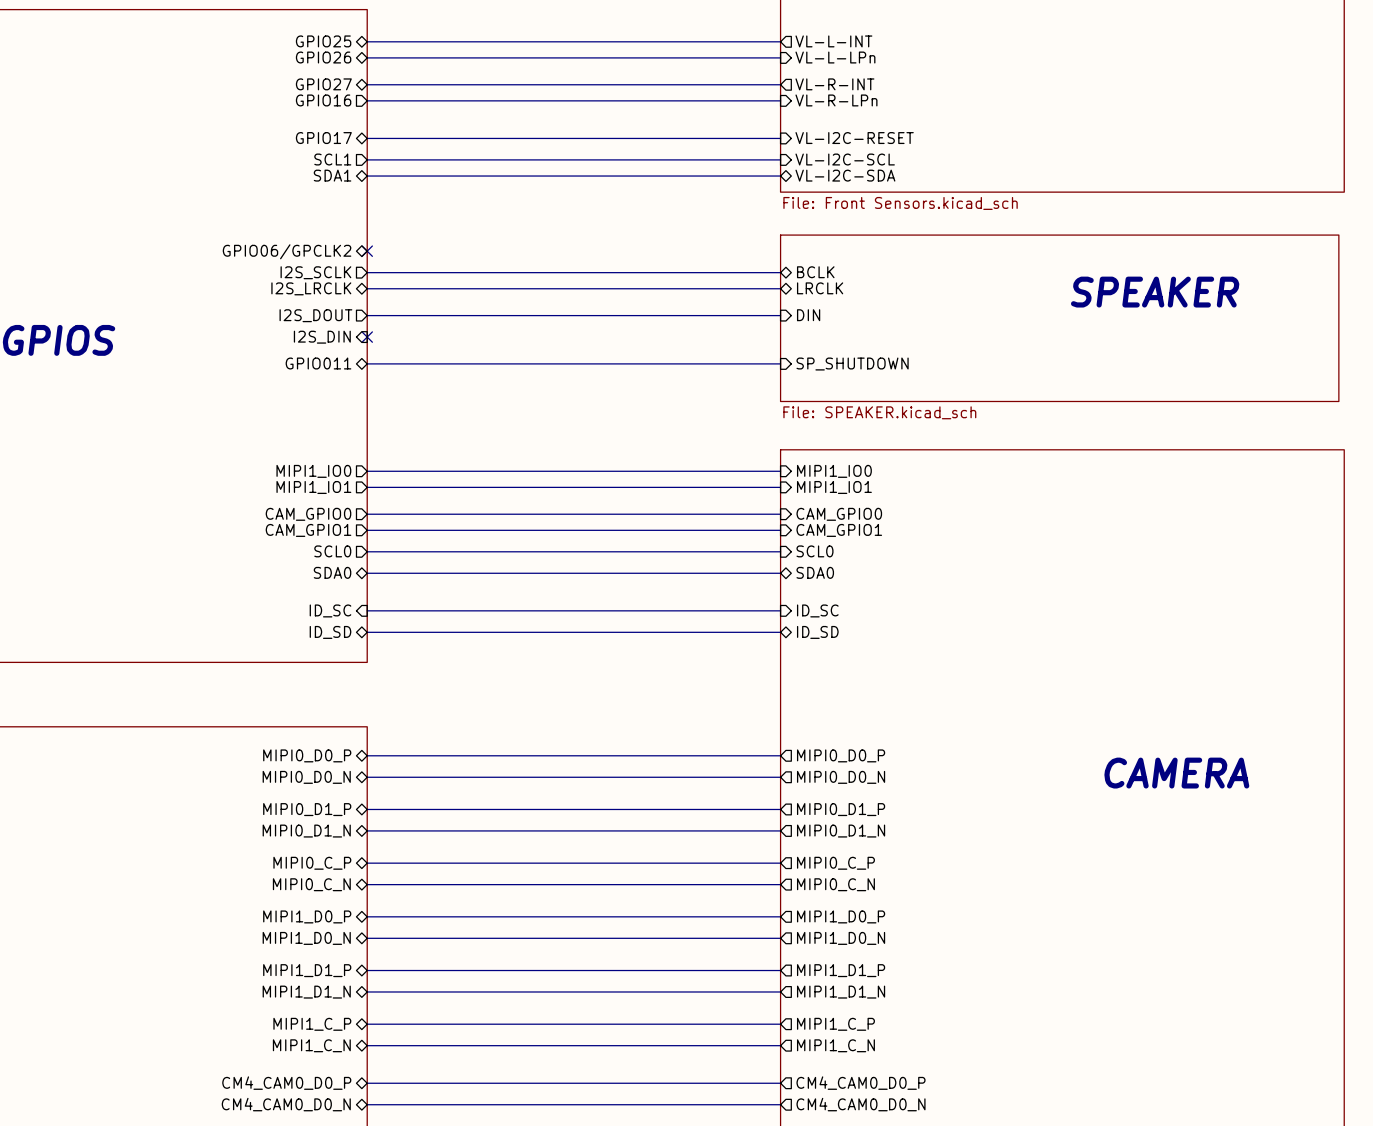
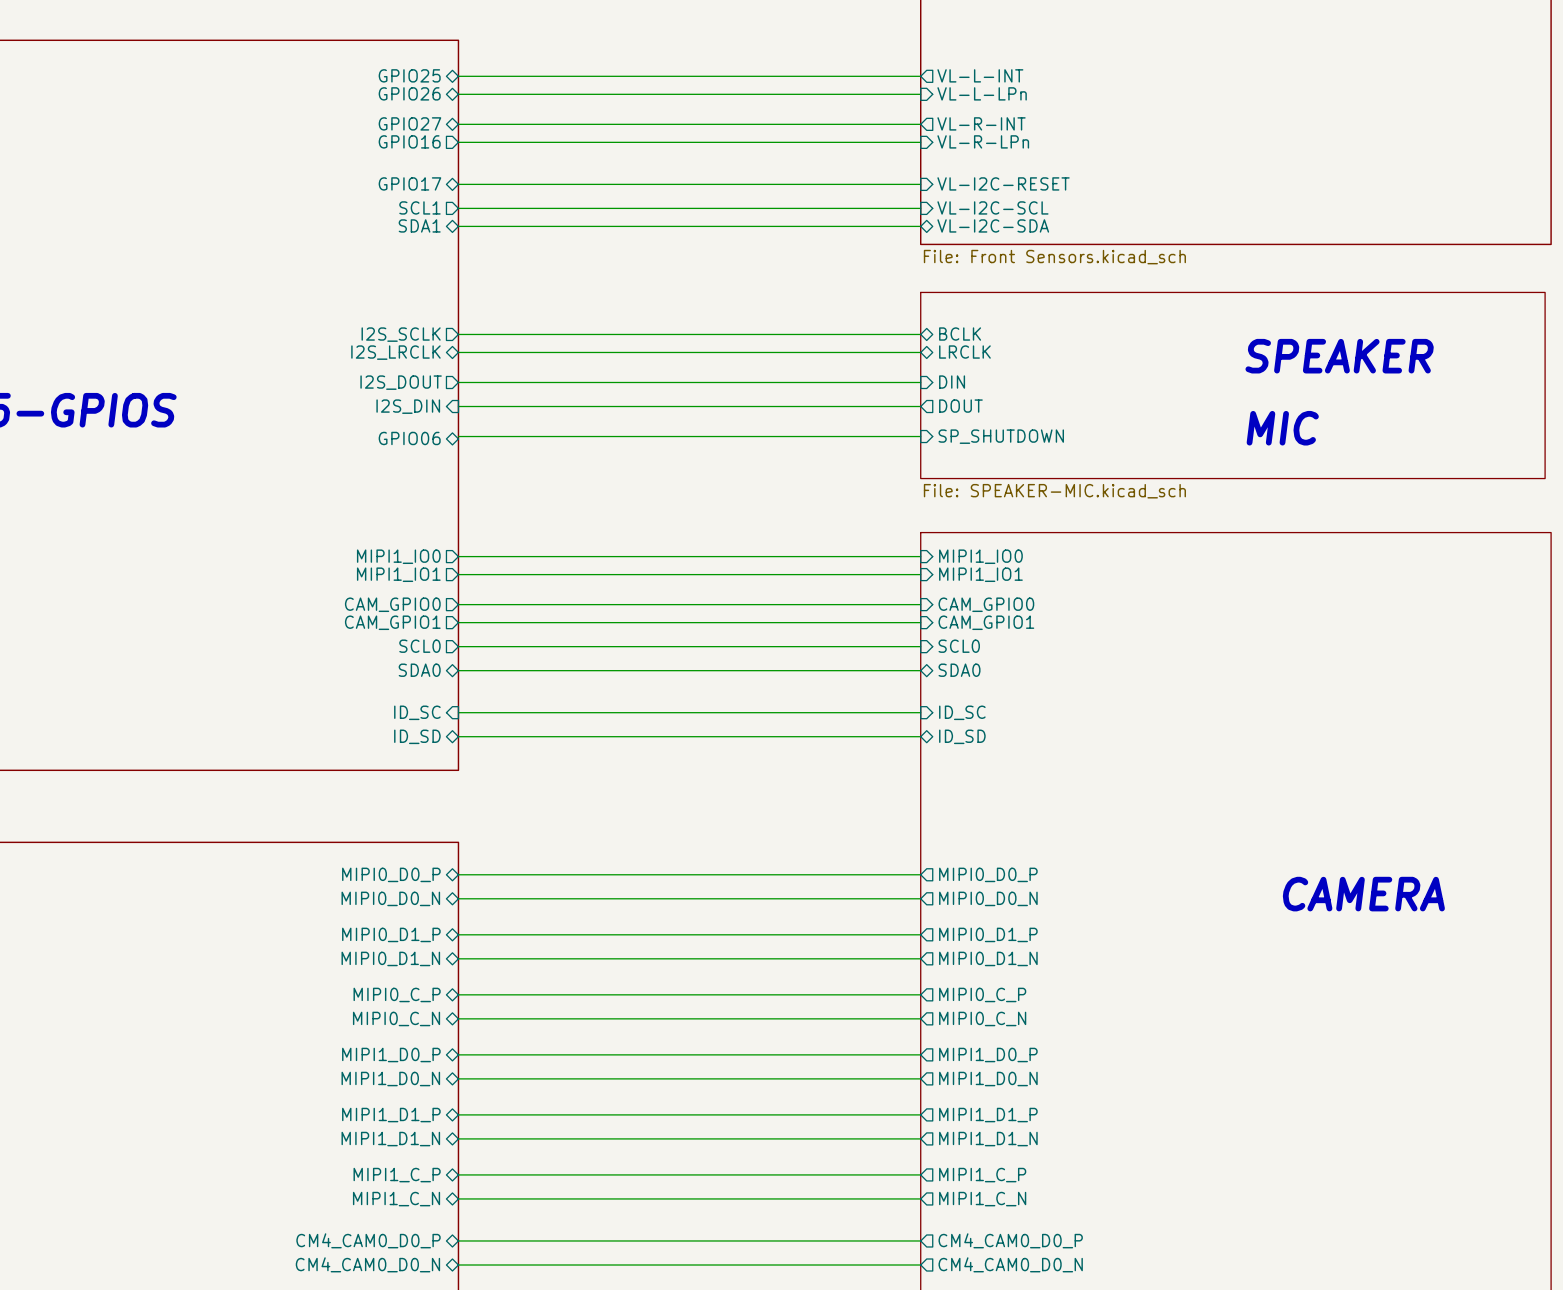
sheet pin: GPIO06/GPCLK2 (287, 251) -> none
no-connect mark: (367, 251) -> none
sheet pin: none -> DOUT (960, 406)
wire: none -> (458, 406) (920, 406)
no-connect mark: (367, 337) -> none
text: none -> MIC (1282, 428)
sheet pin: GPIO011 (318, 363) -> GPIO06 (409, 438)
sheet value: File: SPEAKER.kicad_sch (879, 412) -> File: SPEAKER-MIC.kicad_sch (1054, 491)

